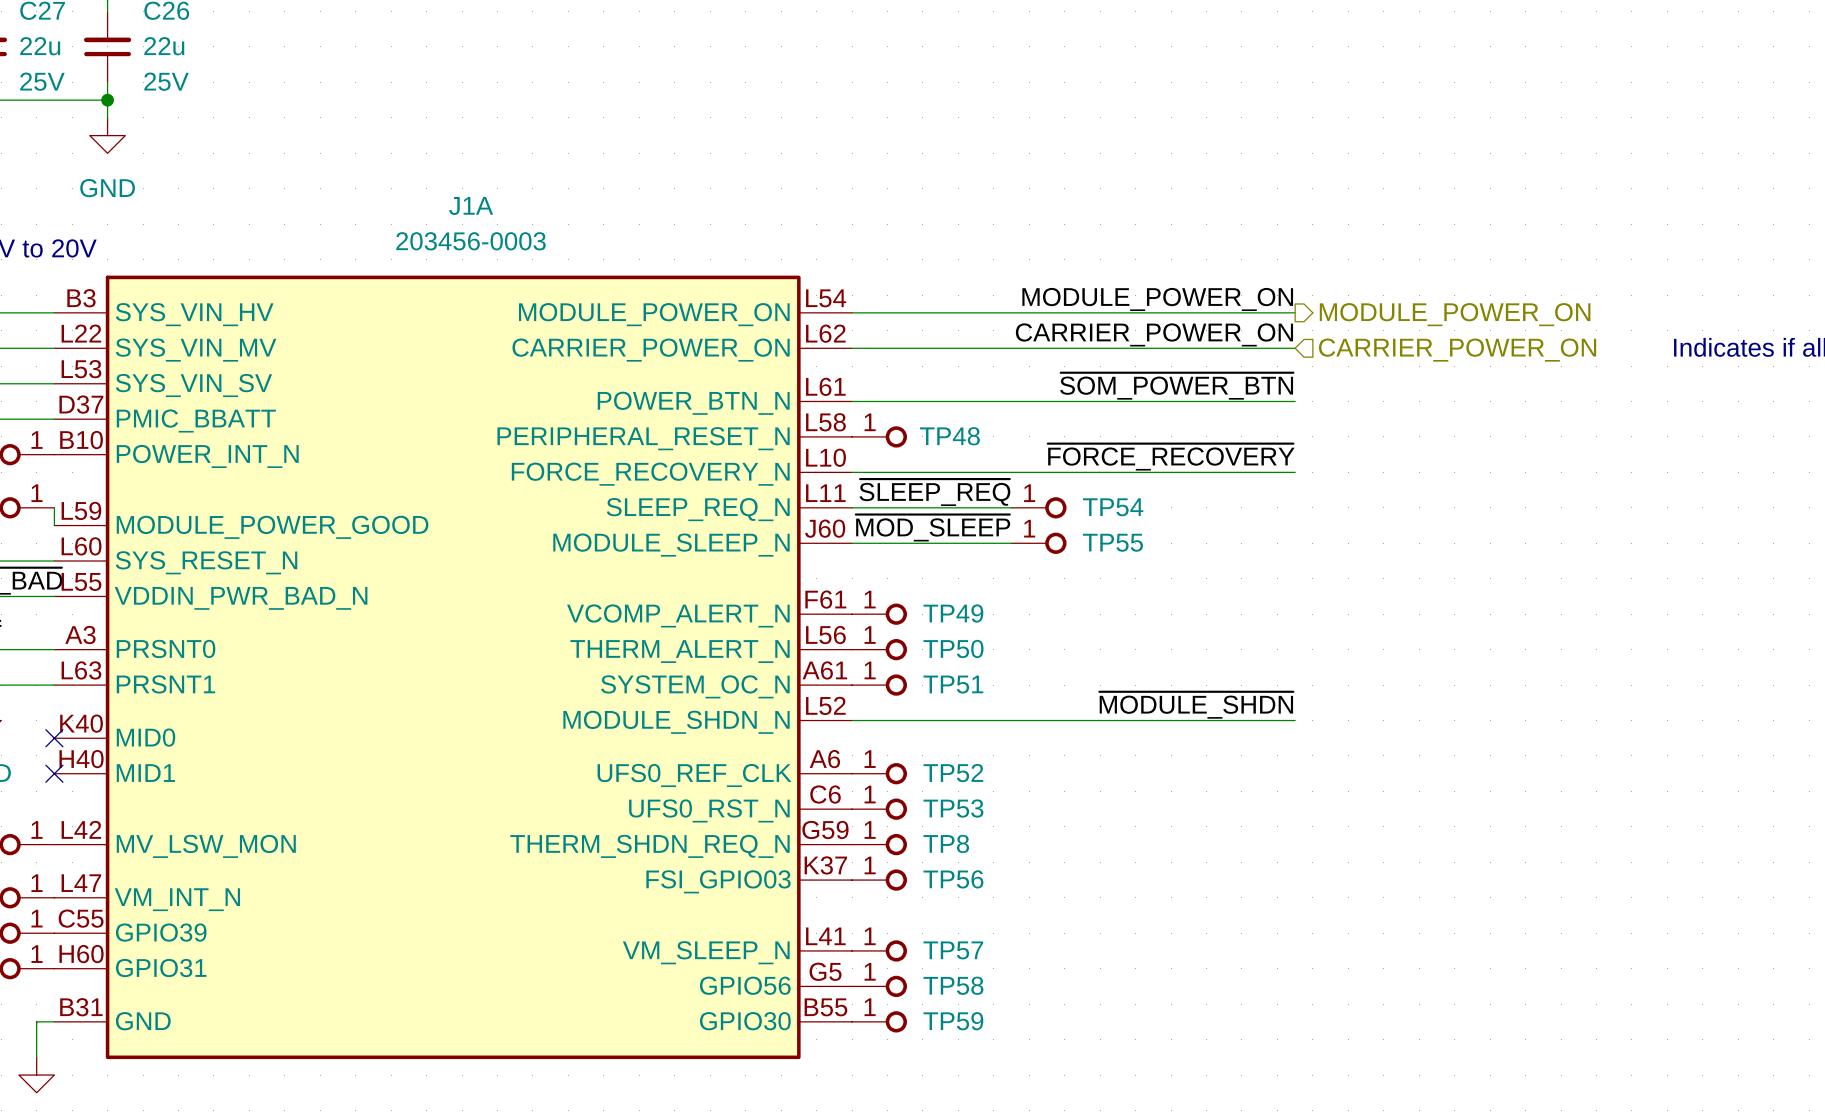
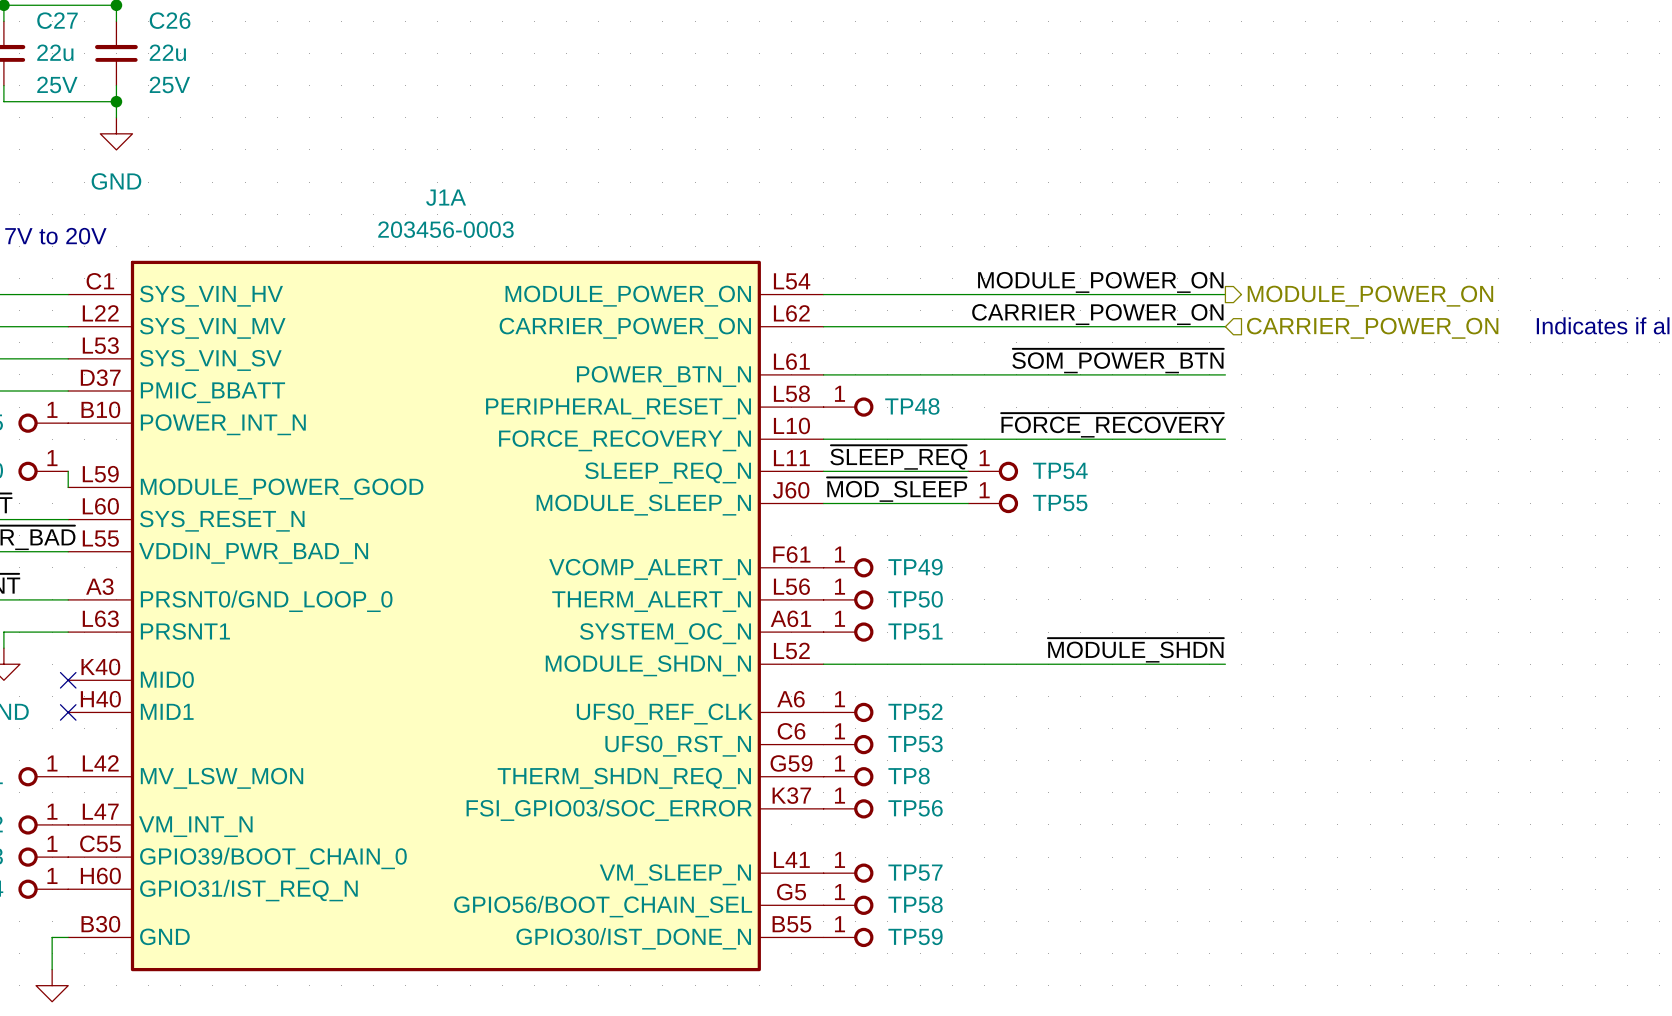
J1A symbol: [54, 275, 853, 1060] -> [68, 260, 824, 972]
label position: MODULE_POWER_ON (1157, 299) -> MODULE_POWER_ON (1100, 282)
wire: none -> (1193, 294) (1225, 294)
hierarchical label position: MODULE_POWER_ON (1455, 314) -> MODULE_POWER_ON (1370, 296)
label position: CARRIER_POWER_ON (1154, 334) -> CARRIER_POWER_ON (1097, 314)
wire: none -> (1193, 326) (1225, 326)
hierarchical label position: CARRIER_POWER_ON (1457, 350) -> CARRIER_POWER_ON (1372, 328)
label position: ~{SOM_POWER_BTN} (1176, 386) -> ~{SOM_POWER_BTN} (1118, 361)
wire: none -> (1193, 374) (1225, 374)
TP48 position: (879, 436) -> (848, 407)
label position: ~{FORCE_RECOVERY} (1171, 457) -> ~{FORCE_RECOVERY} (1113, 425)
wire: none -> (1193, 439) (1225, 439)
label position: ~{SLEEP_REQ} (934, 492) -> ~{SLEEP_REQ} (898, 457)
TP54 position: (1039, 507) -> (993, 471)
label position: ~{MOD_SLEEP} (933, 527) -> ~{MOD_SLEEP} (897, 489)
TP55 position: (1039, 543) -> (993, 503)
TP49 position: (879, 614) -> (848, 567)
TP50 position: (879, 649) -> (848, 599)
TP51 position: (879, 685) -> (848, 632)
label position: ~{MODULE_SHDN} (1196, 705) -> ~{MODULE_SHDN} (1135, 650)
wire: none -> (1193, 664) (1225, 664)
TP52 position: (879, 773) -> (848, 712)
TP53 position: (879, 809) -> (848, 744)
TP8 position: (879, 844) -> (848, 776)
TP56 position: (879, 880) -> (848, 808)
TP57 position: (879, 950) -> (848, 873)
TP58 position: (879, 986) -> (848, 905)
TP59 position: (879, 1021) -> (848, 937)

